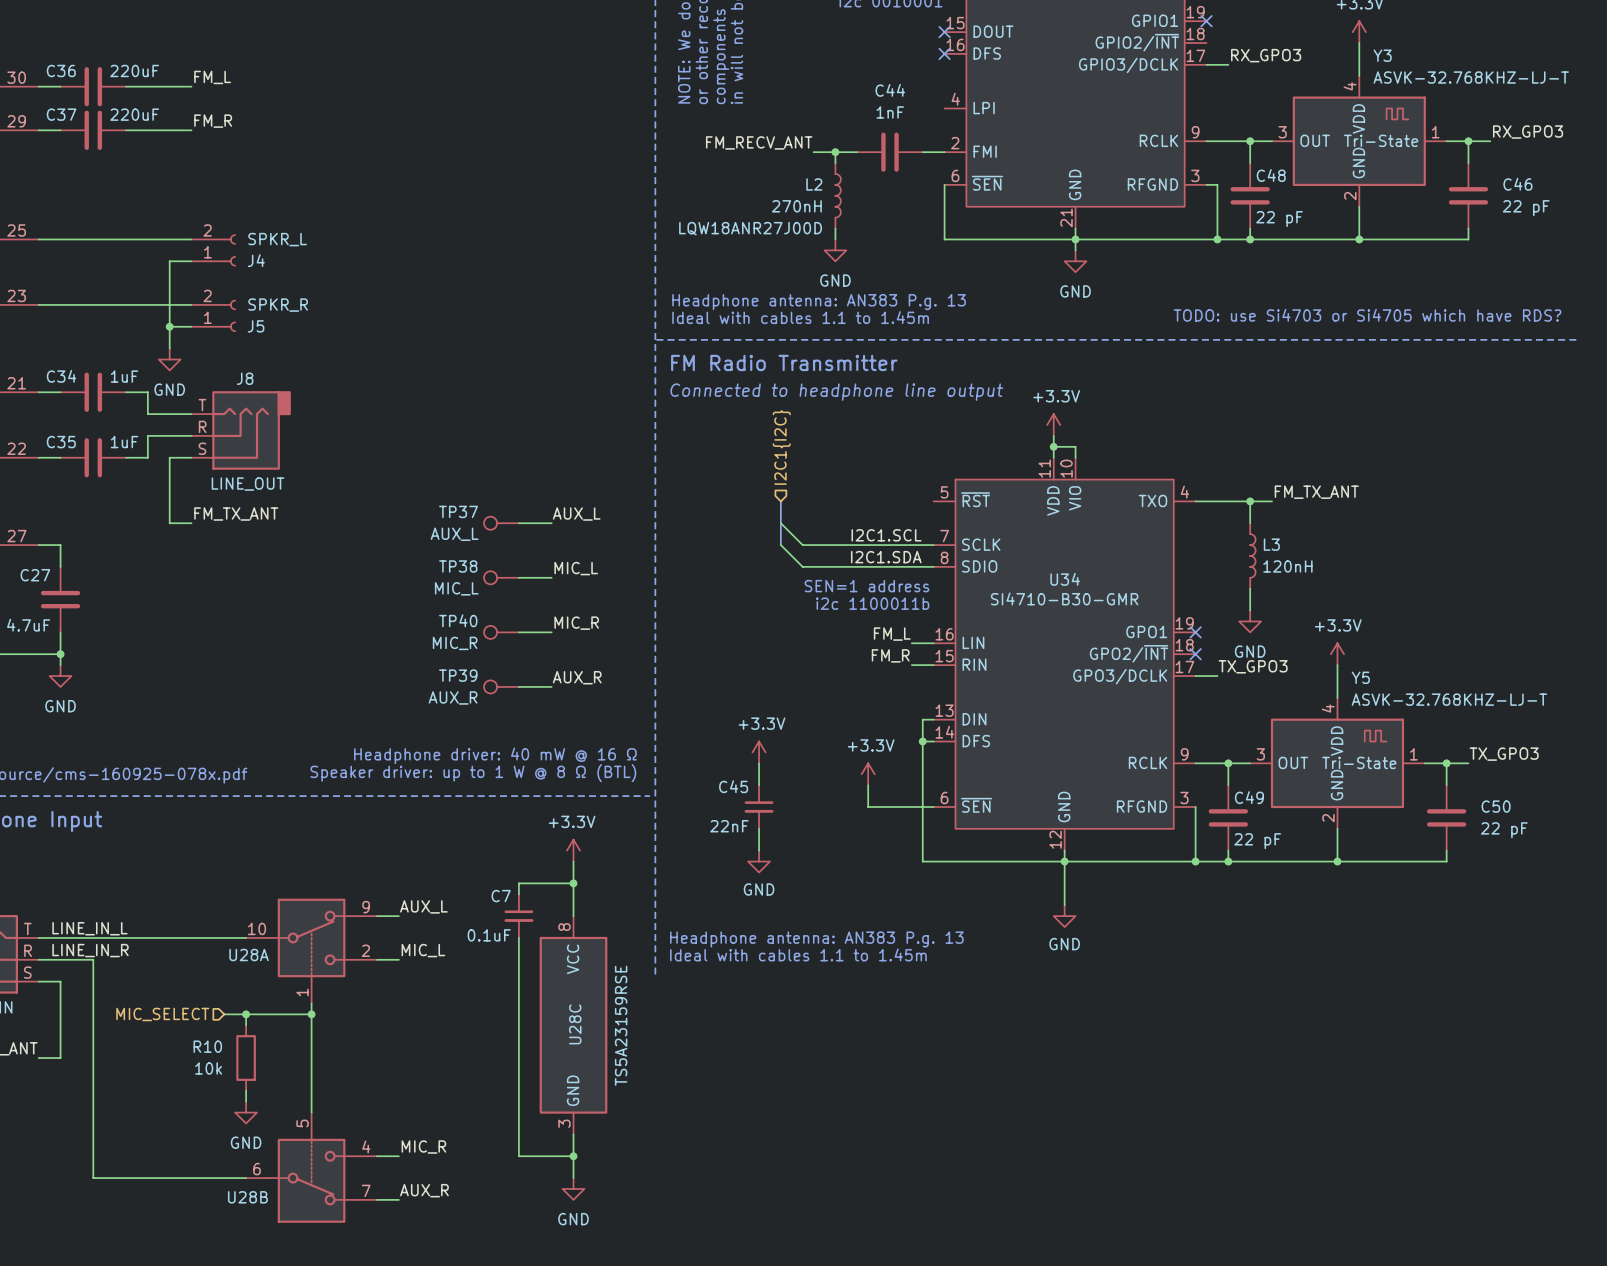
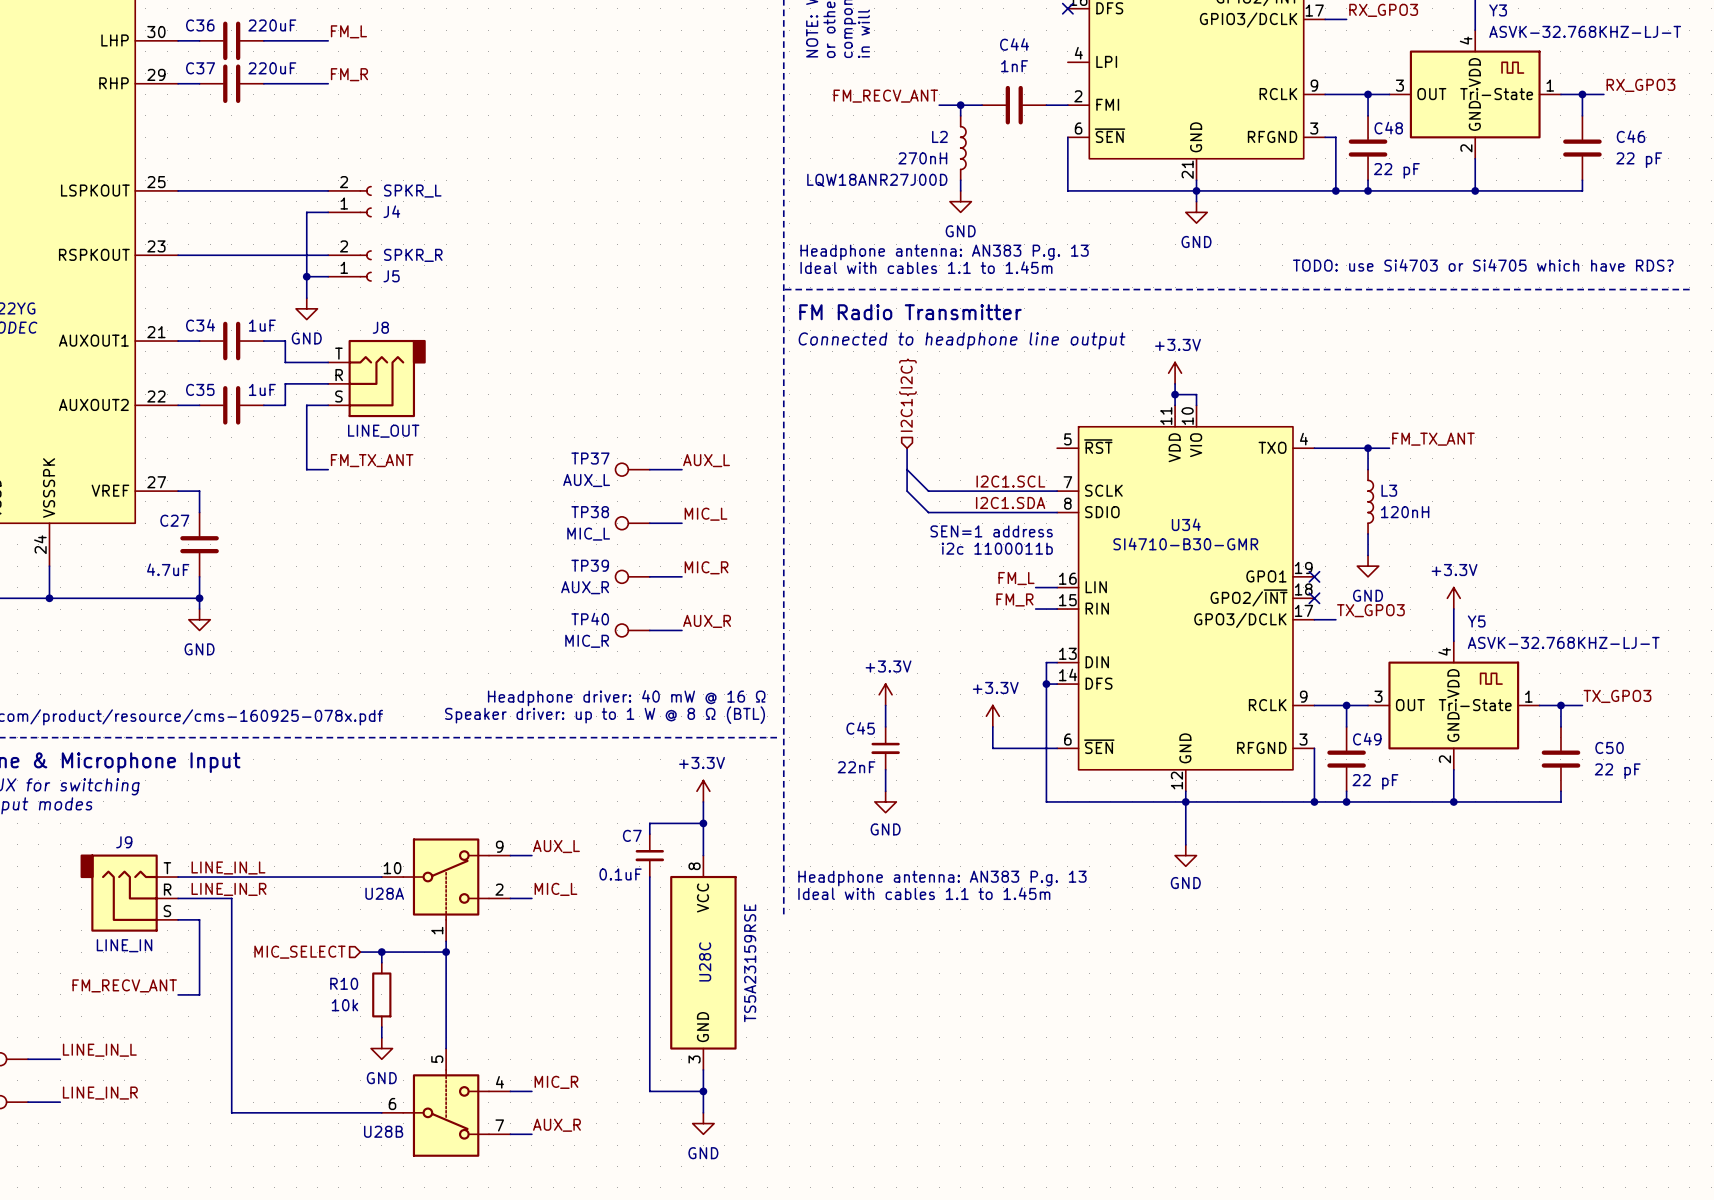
TP40 name: TP40 (458, 620) -> TP39 (590, 565)
TP40 value: MIC_R (455, 643) -> AUX_R (585, 587)
TP39 name: TP39 (458, 675) -> TP40 (590, 619)
TP39 value: AUX_R (453, 697) -> MIC_R (587, 641)

